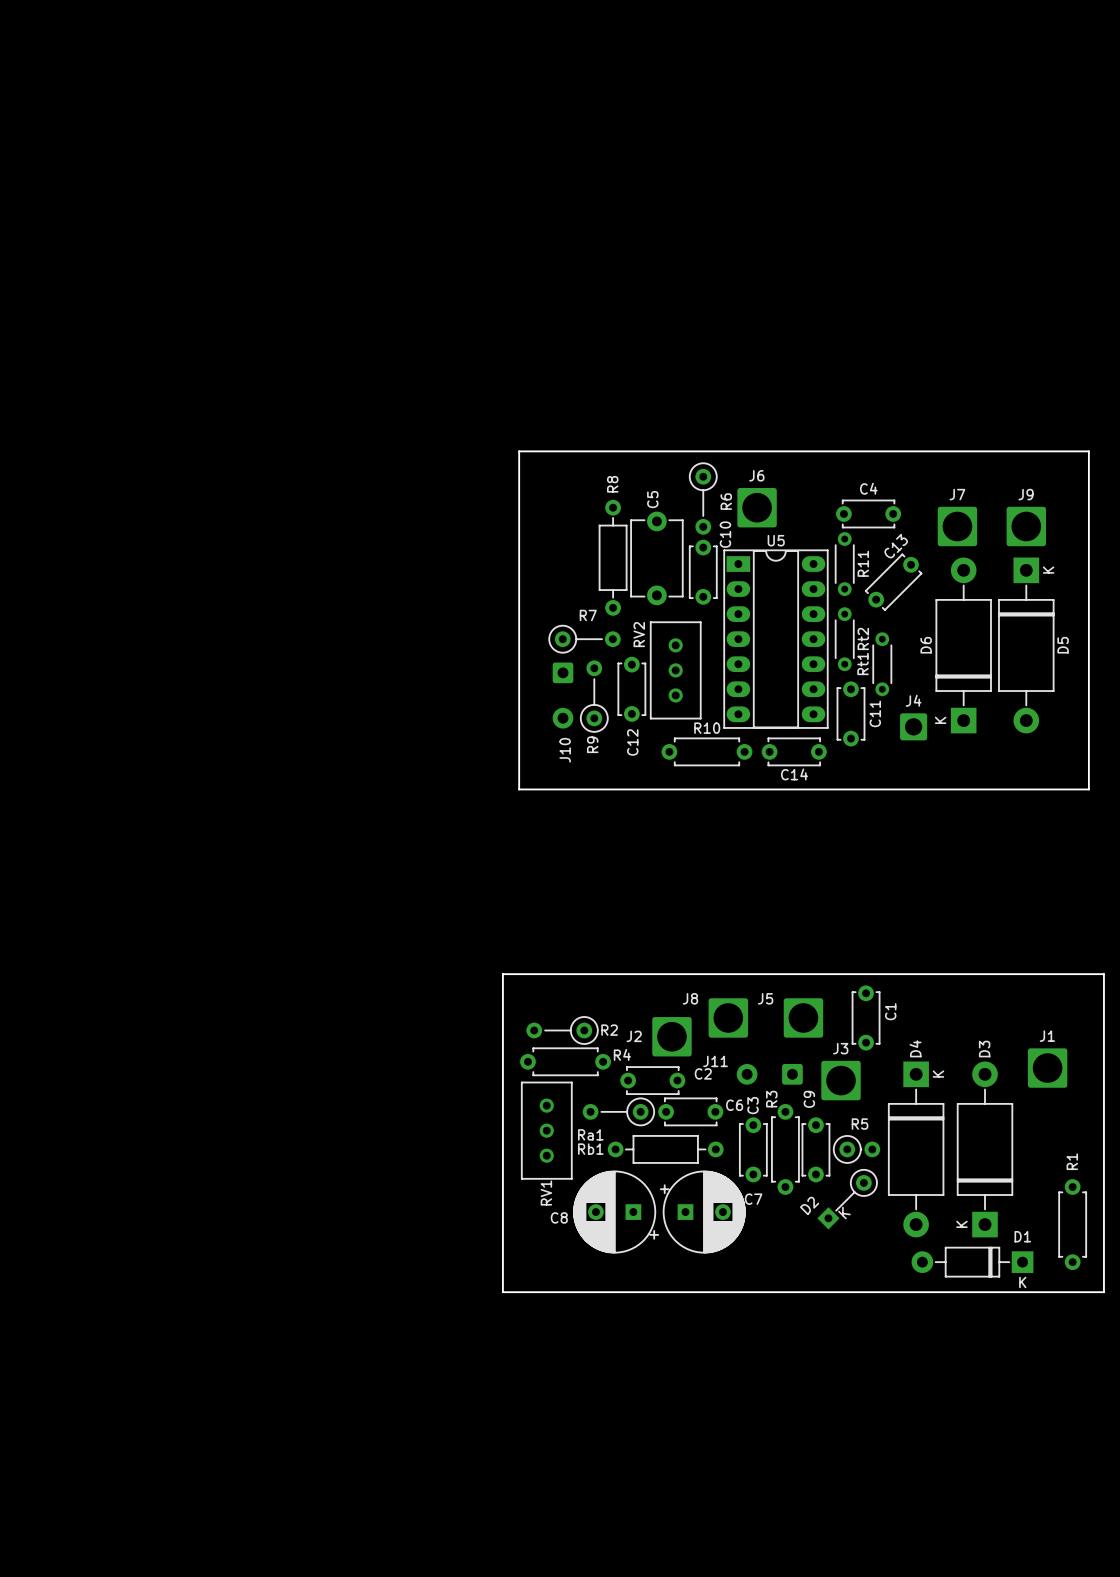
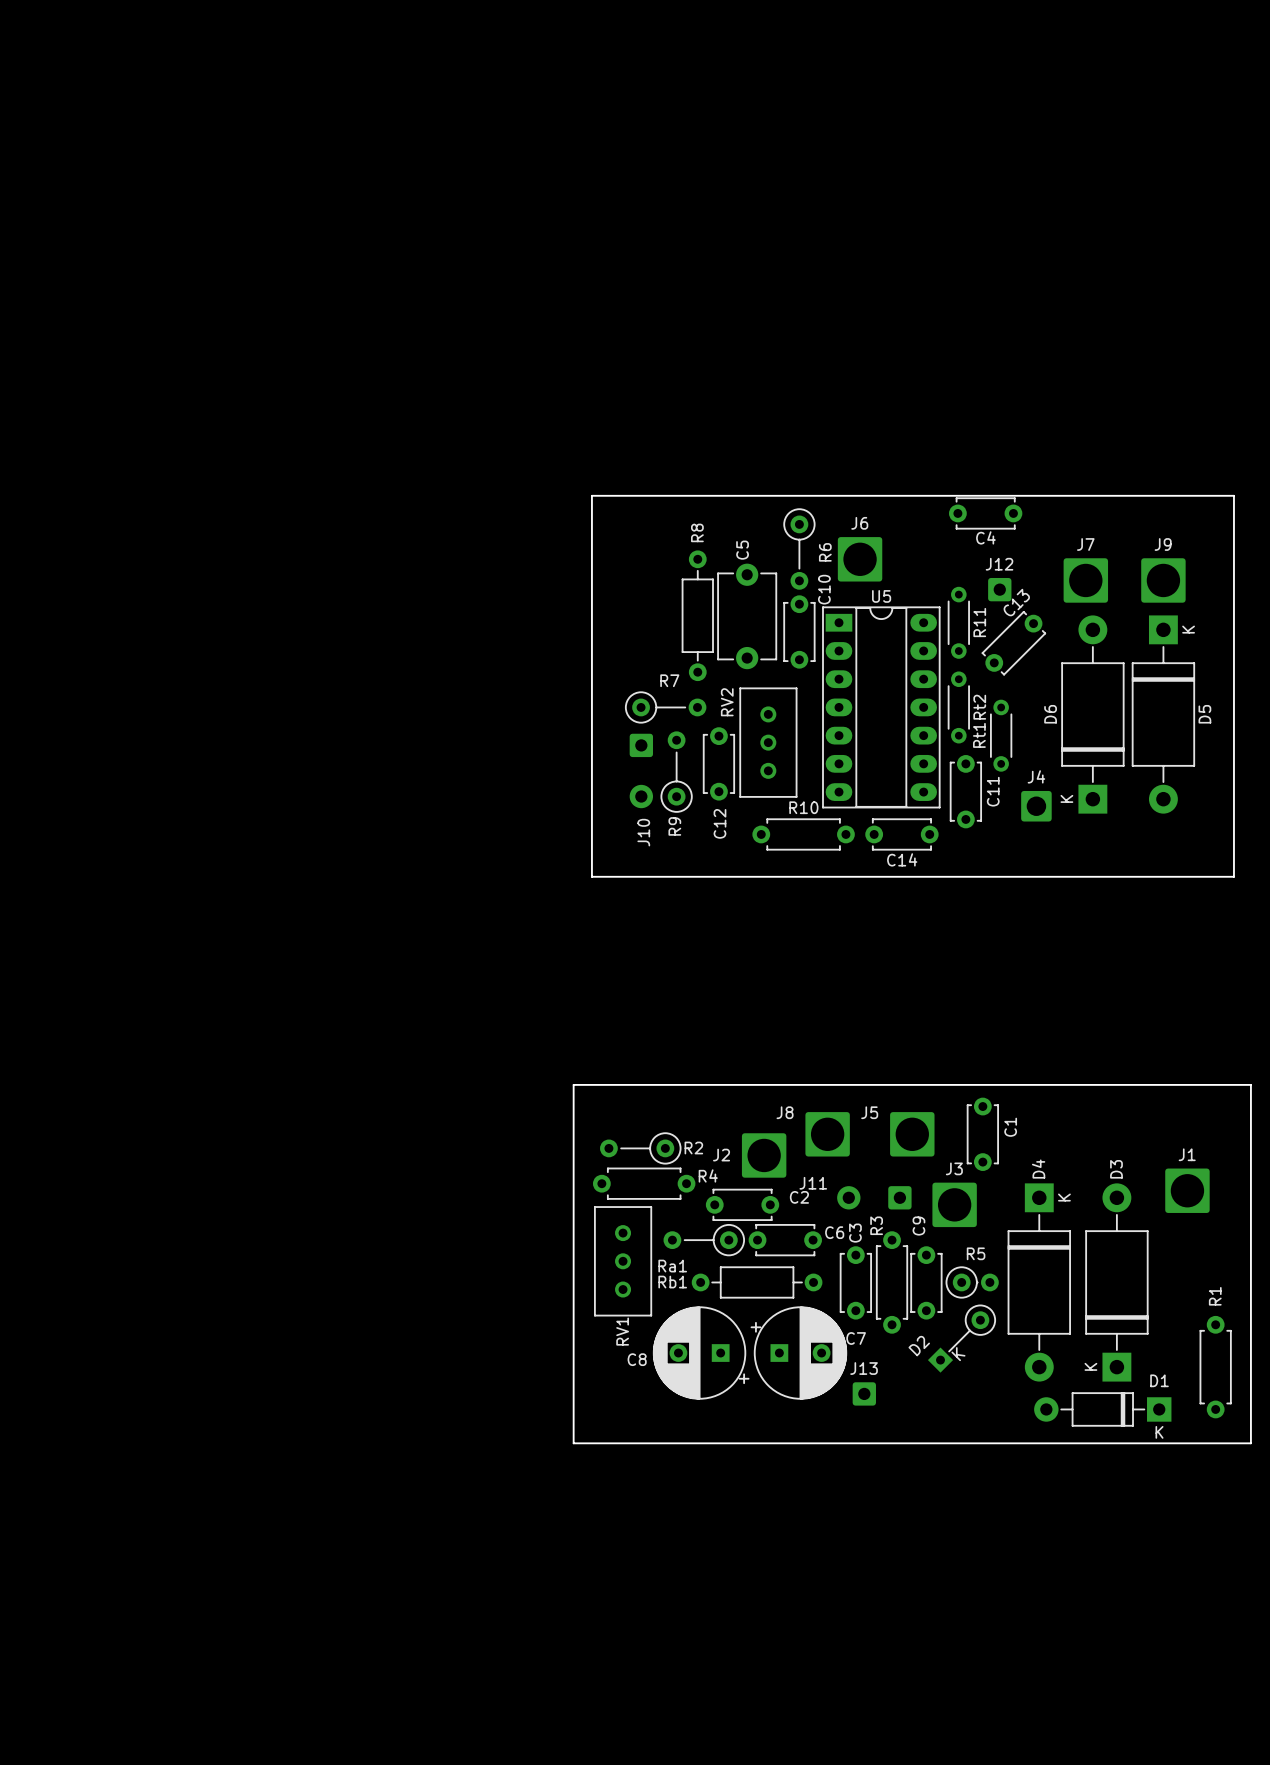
C4 position: (868, 513) -> (985, 513)
J12: none -> (999, 589)
J13: none -> (864, 1393)

